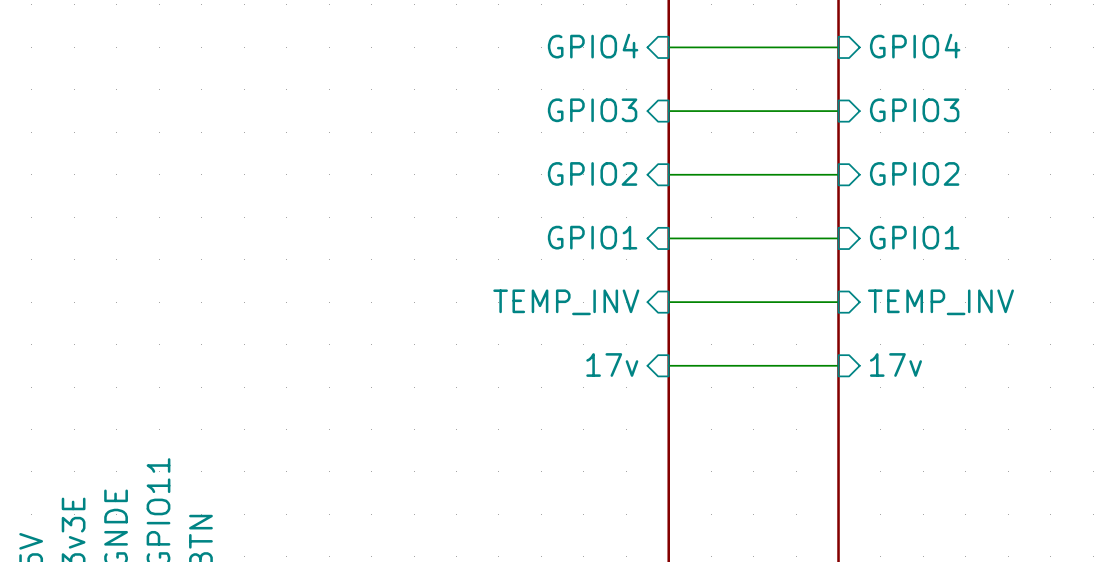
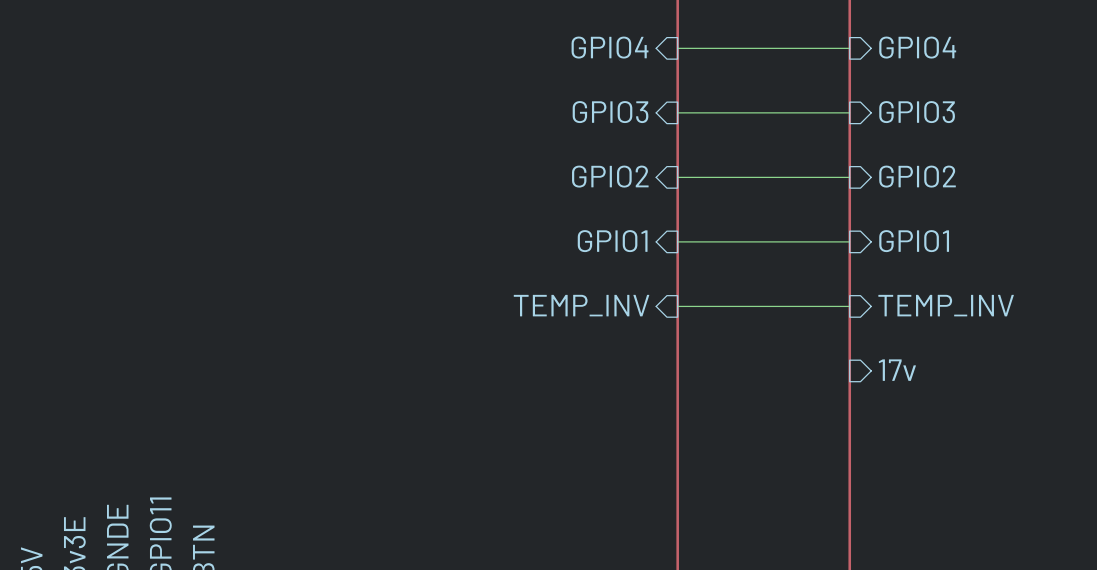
sheet pin: 17v (612, 364) -> none
wire: (668, 365) (838, 365) -> none

